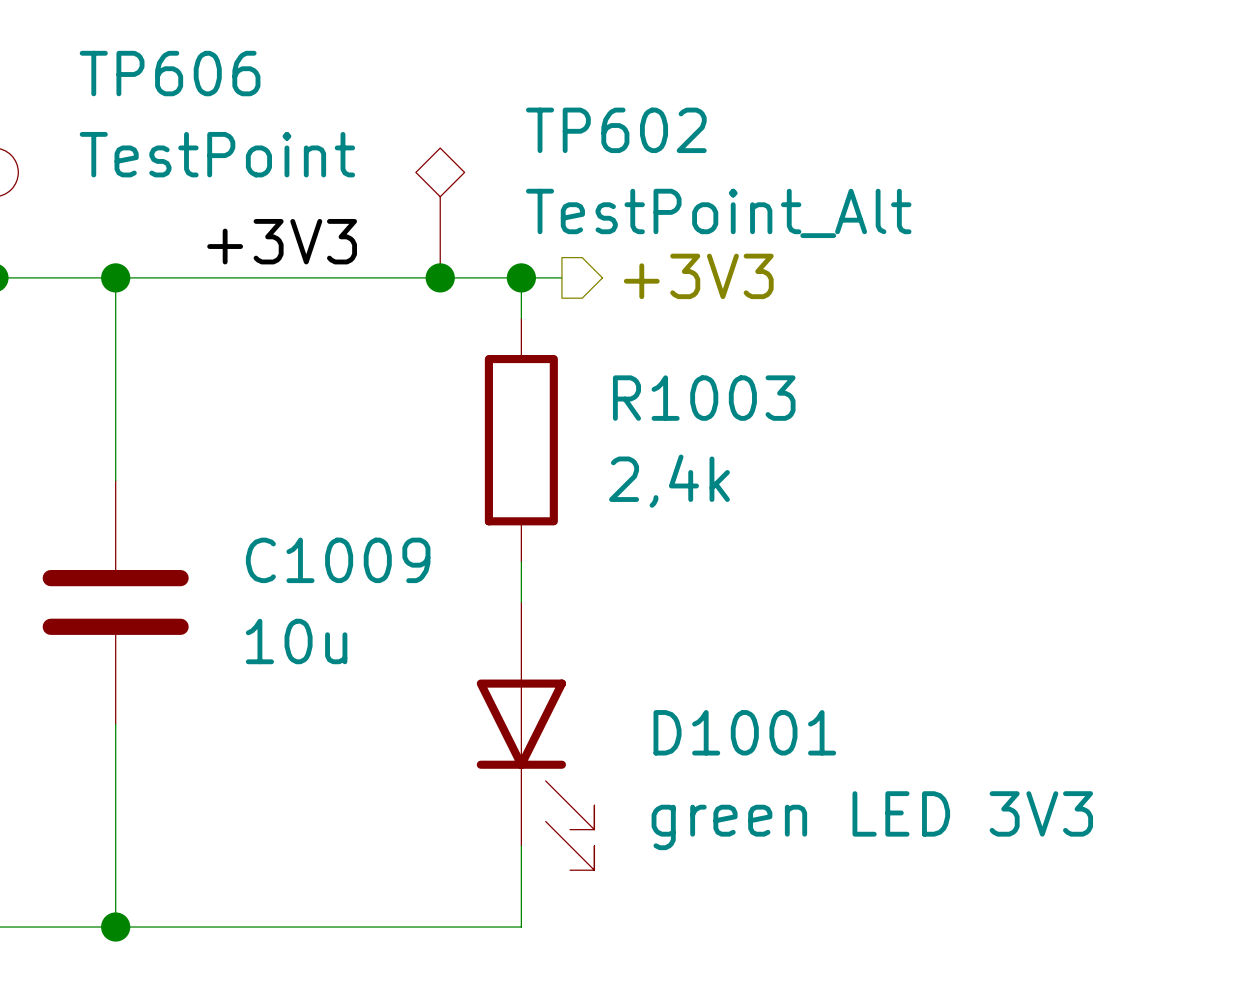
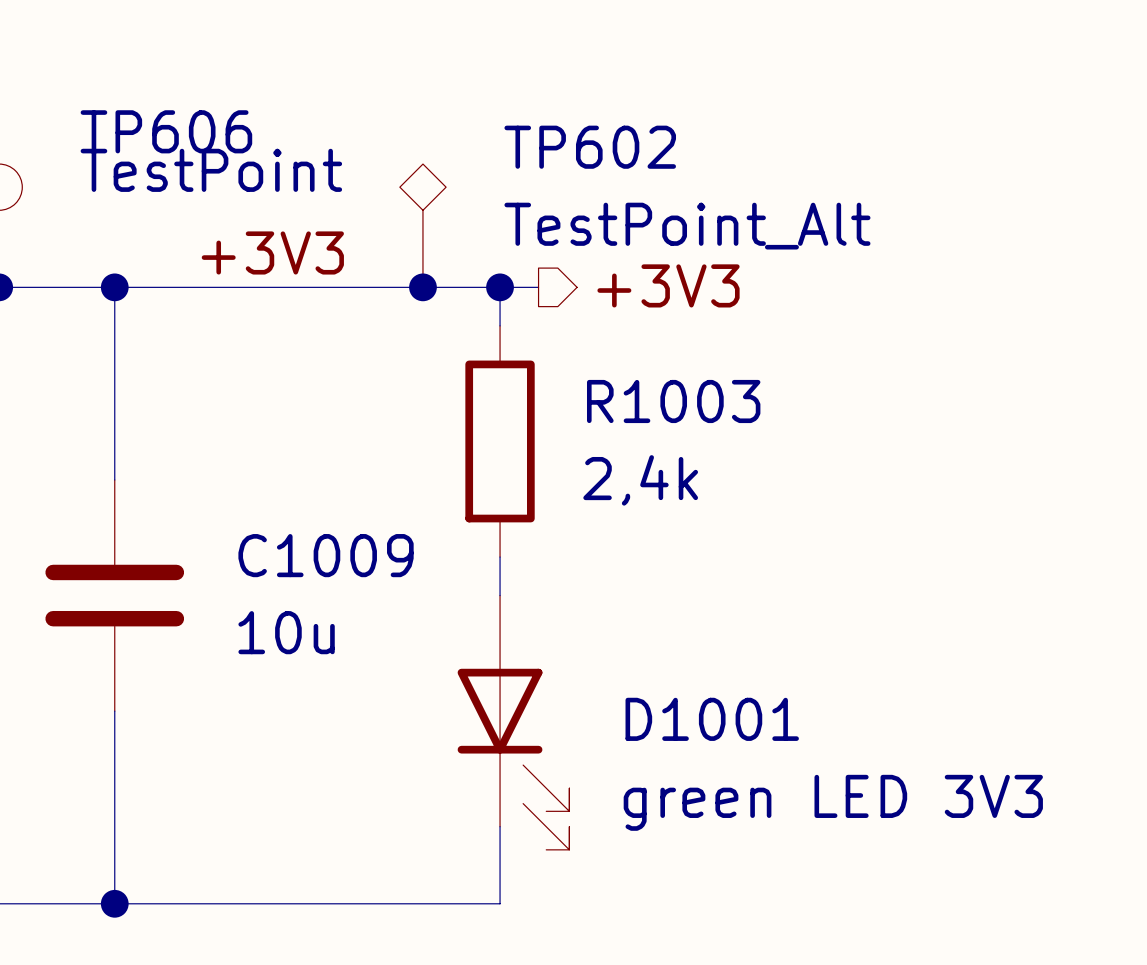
TP606 name position: TP606 (170, 73) -> TP606 (166, 131)

